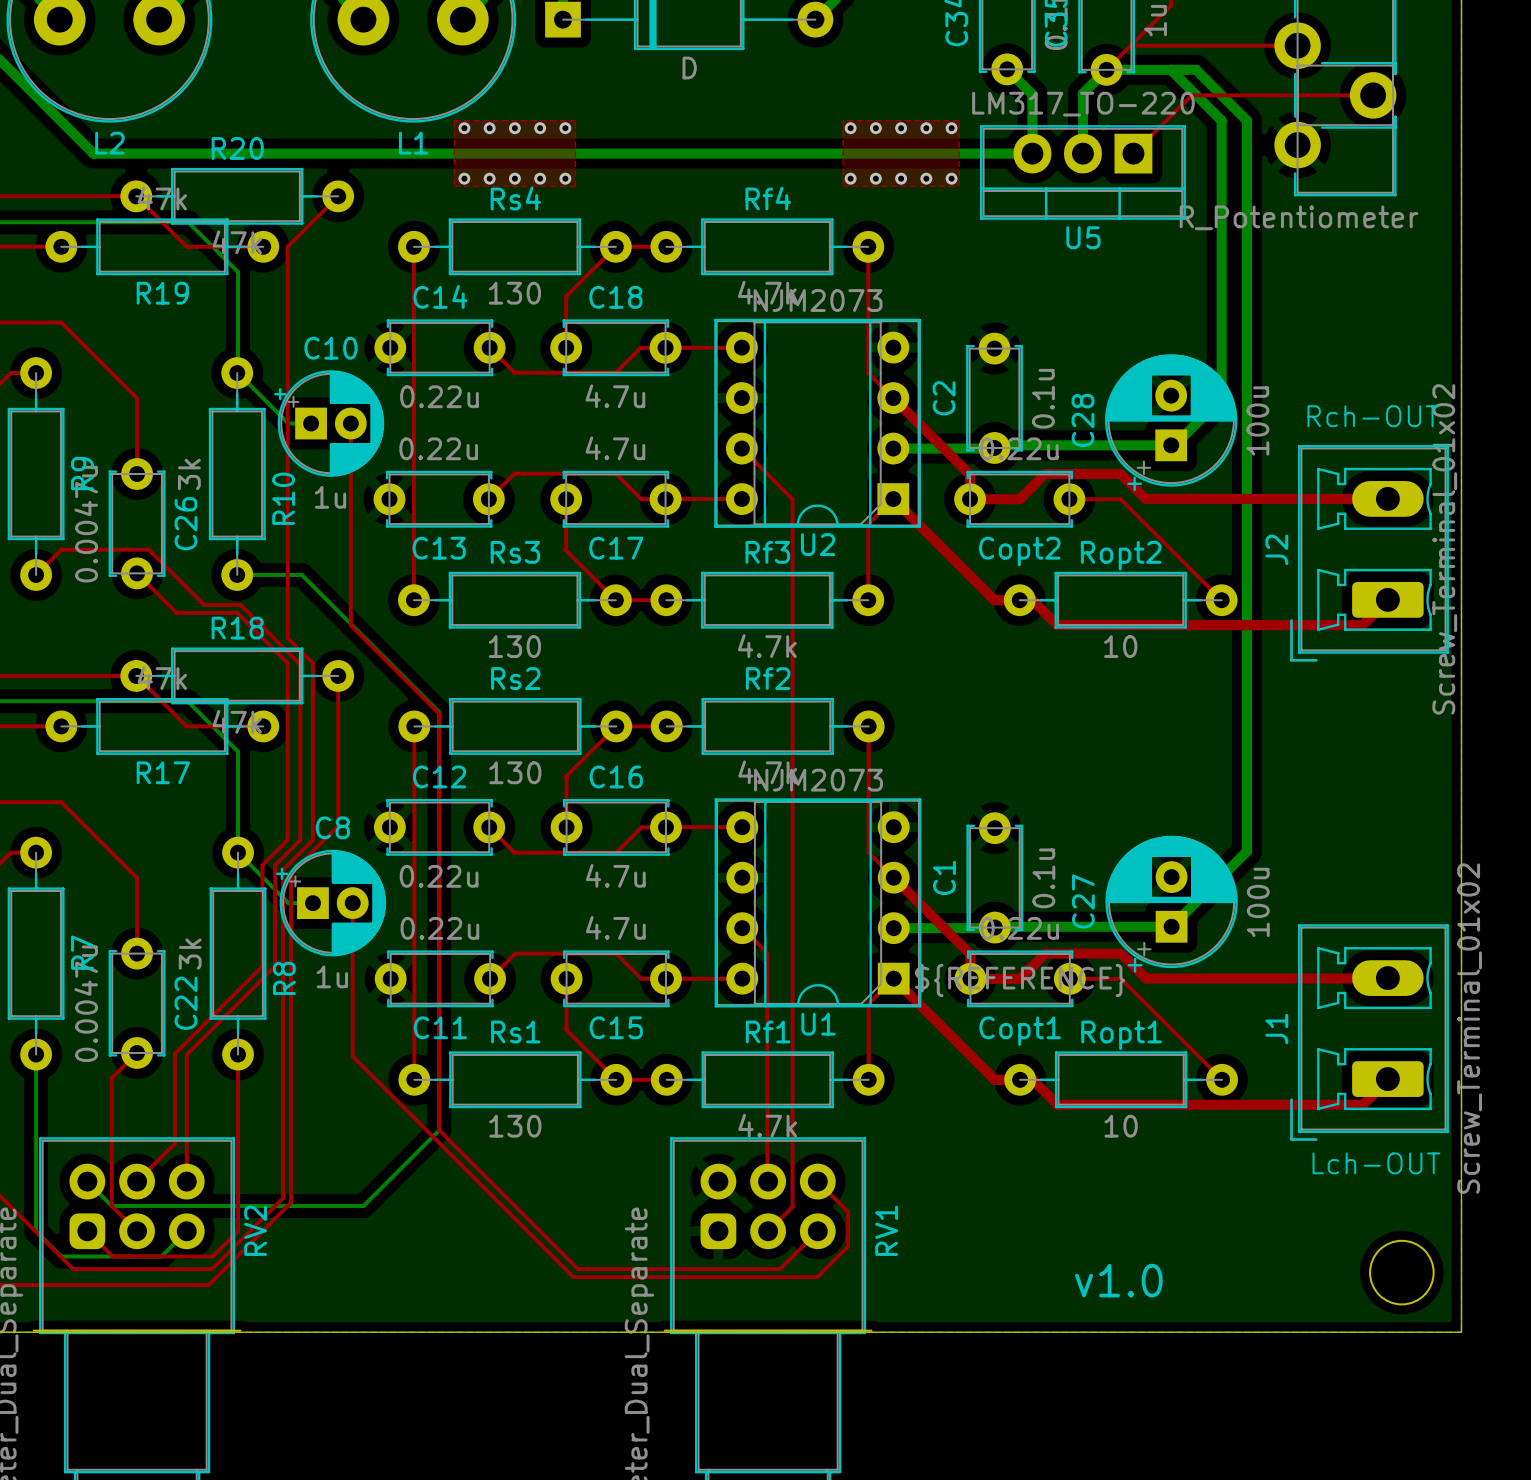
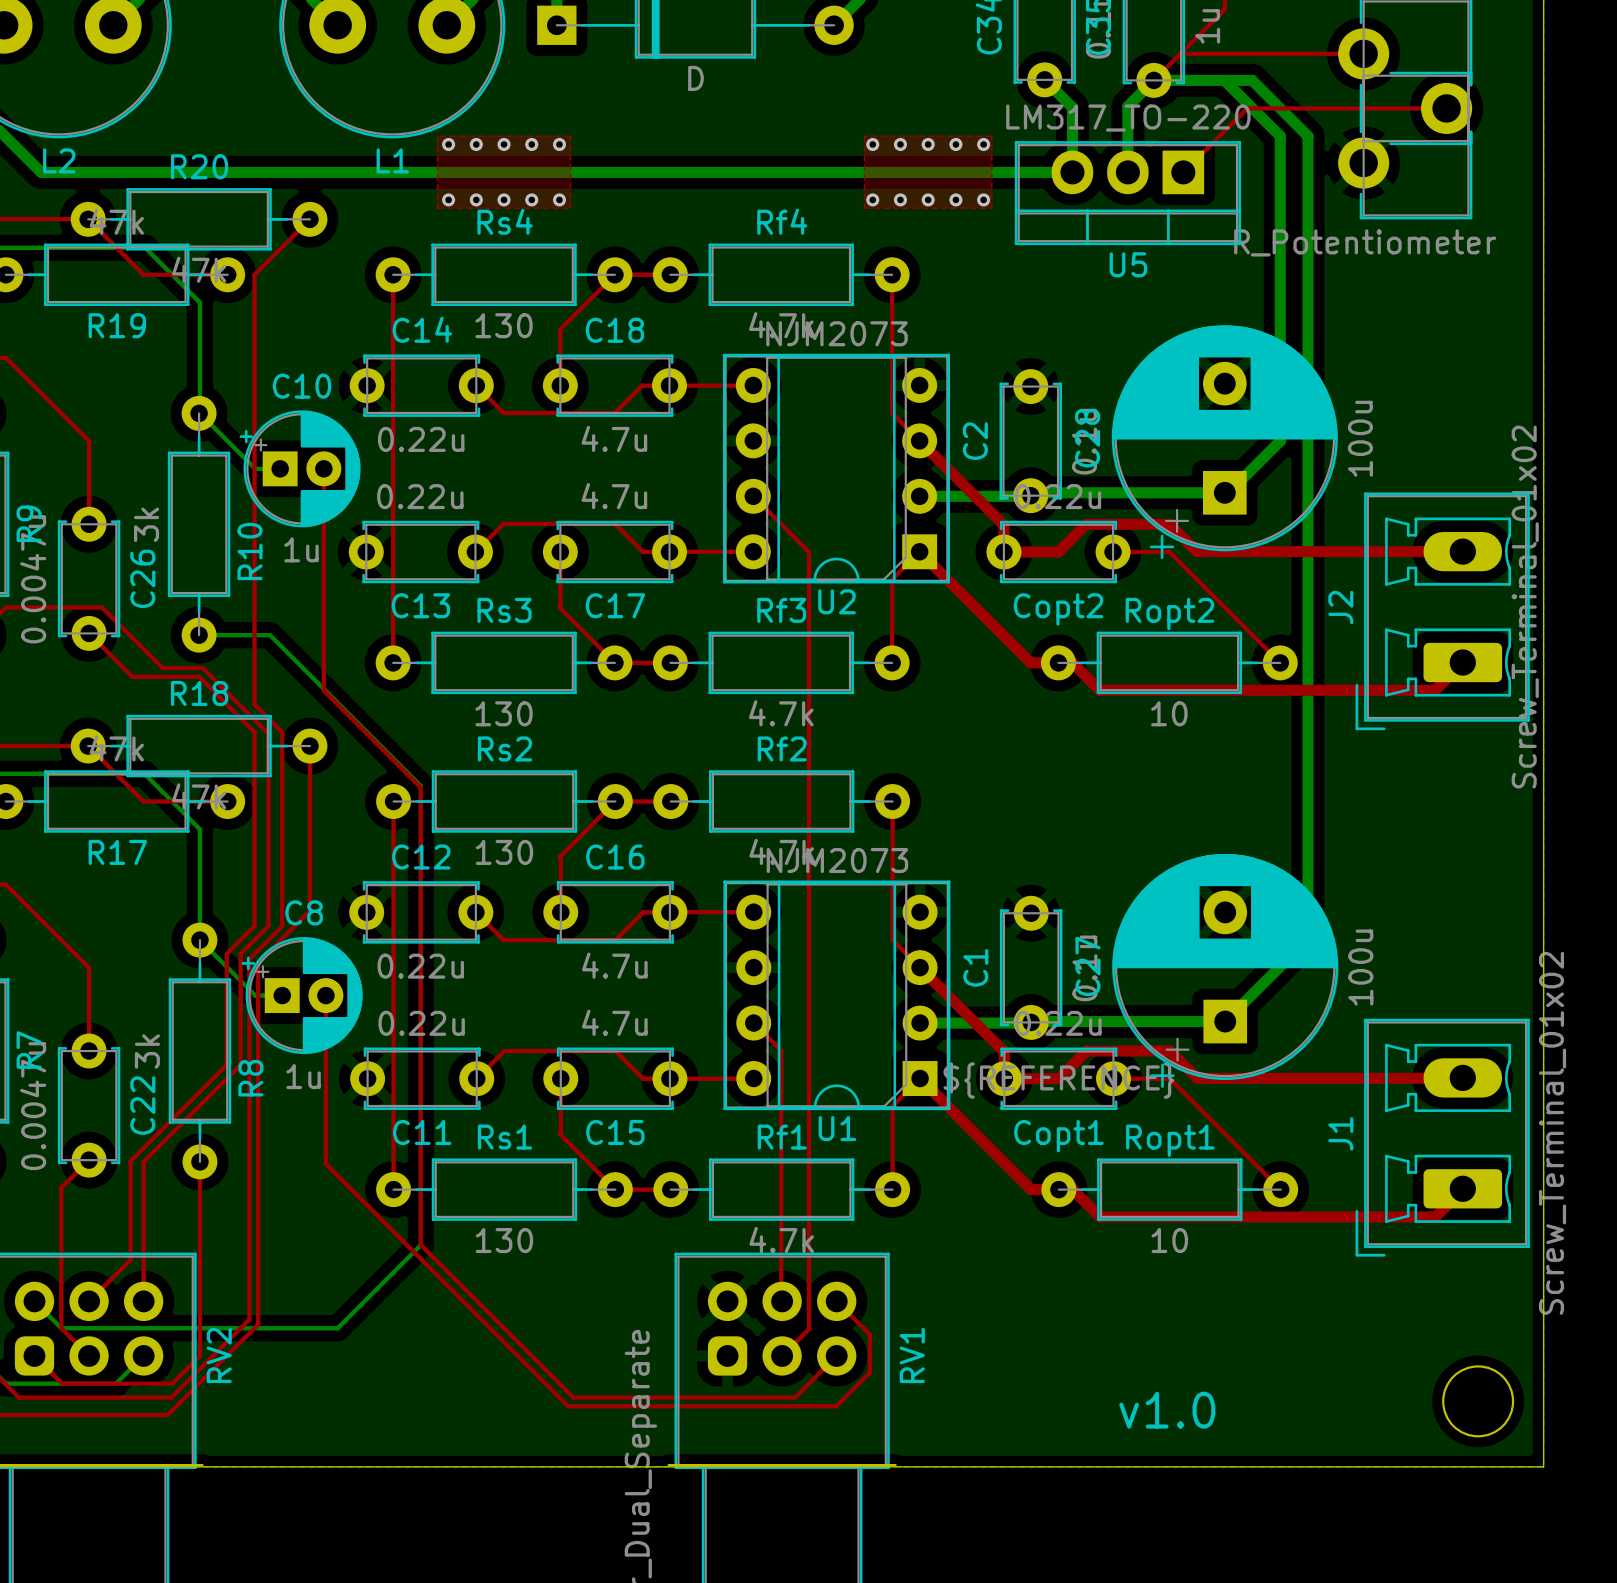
C28 footprint: [1105, 354, 1238, 492] -> [1111, 325, 1338, 560]
text: Rch-OUT (1373, 416) -> none
C27 footprint: [1105, 835, 1238, 973] -> [1112, 853, 1339, 1088]
text: Lch-OUT (1376, 1163) -> none

